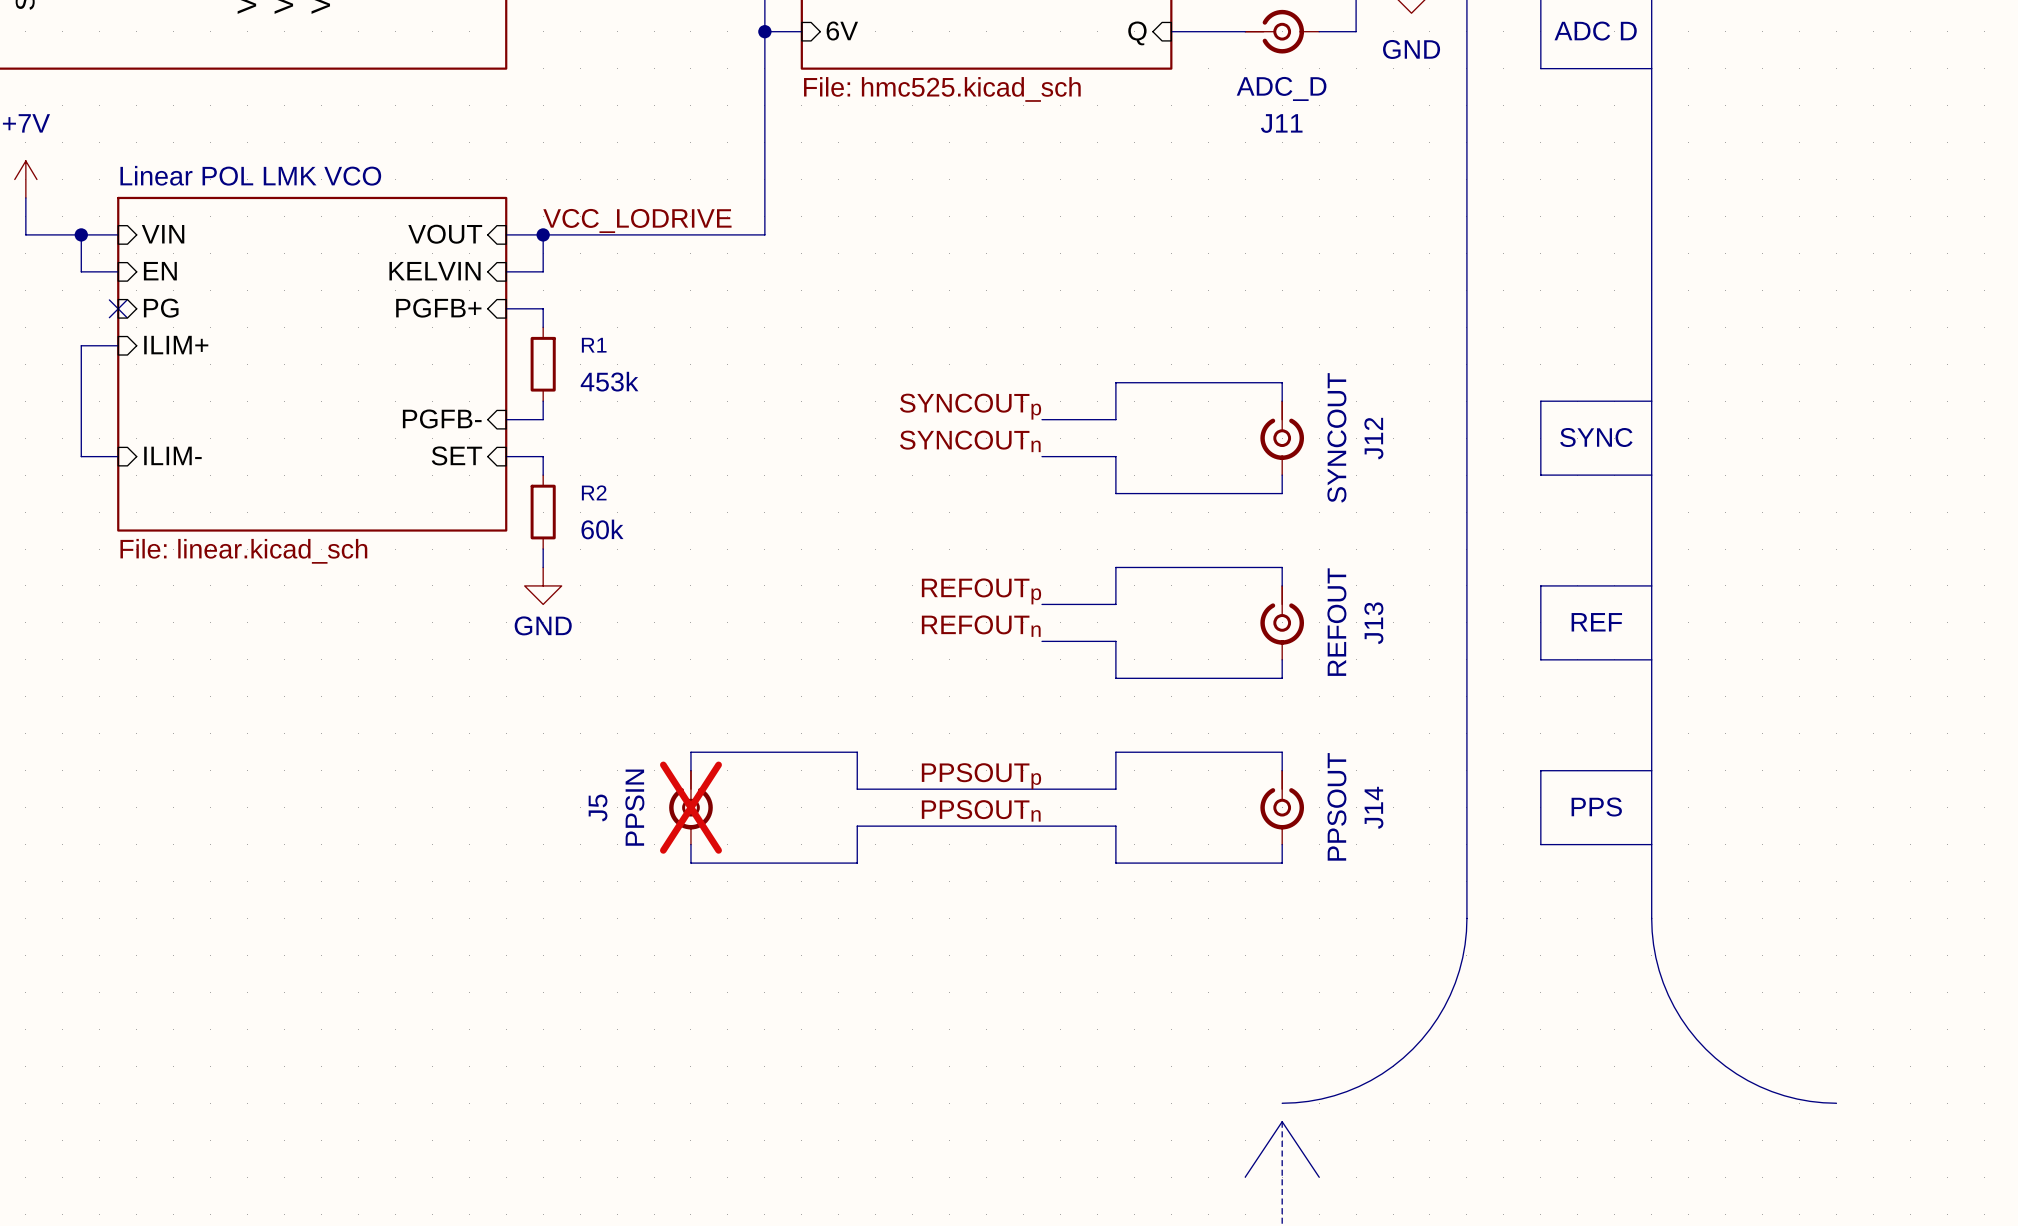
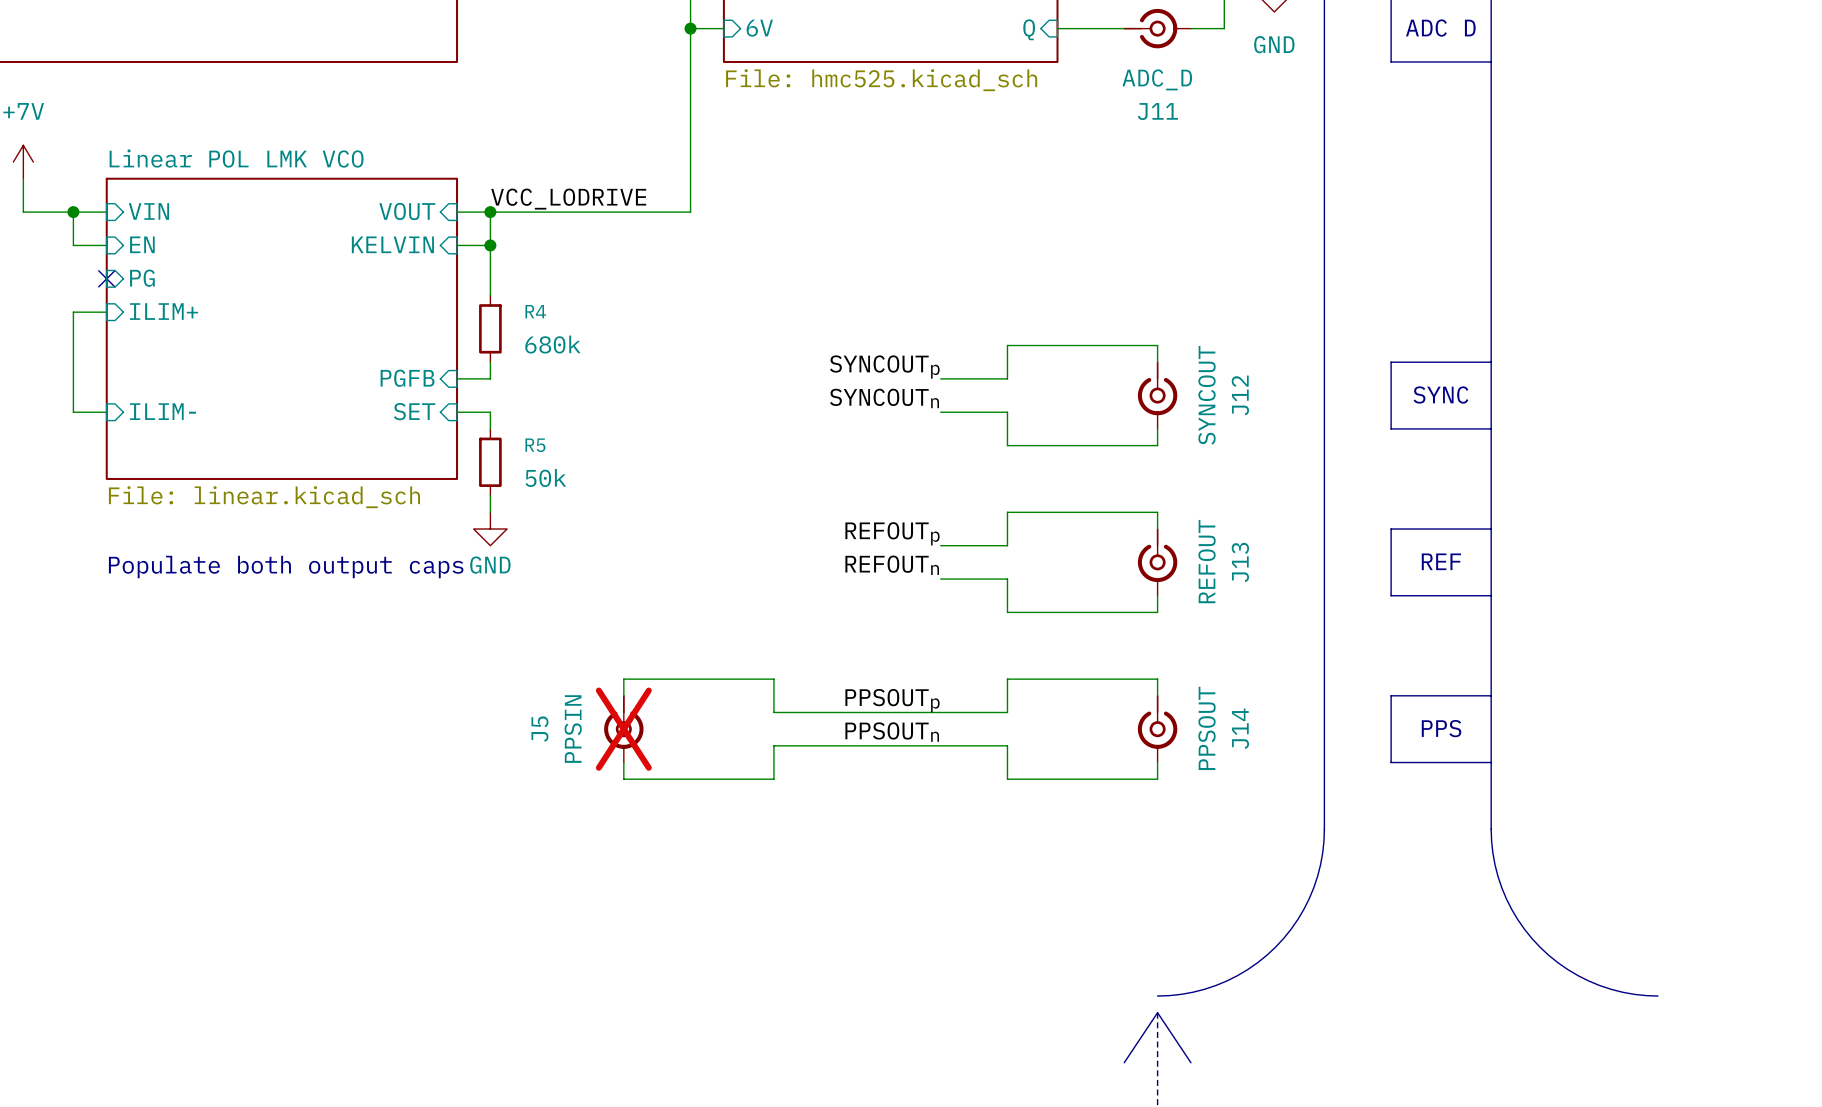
junction: none -> (490, 245)
sheet pin: PGFB+ (438, 308) -> none
wire: (506, 308) (543, 308) -> (490, 245) (490, 278)
R1 name: R1 (594, 345) -> R4 (535, 311)
R1 value: 453k (609, 381) -> 680k (552, 344)
sheet pin: PGFB- (442, 418) -> PGFB (407, 378)
R2 name: R2 (594, 492) -> R5 (535, 445)
R2 value: 60k (602, 529) -> 50k (545, 477)
text: none -> Populate both output caps (286, 567)

